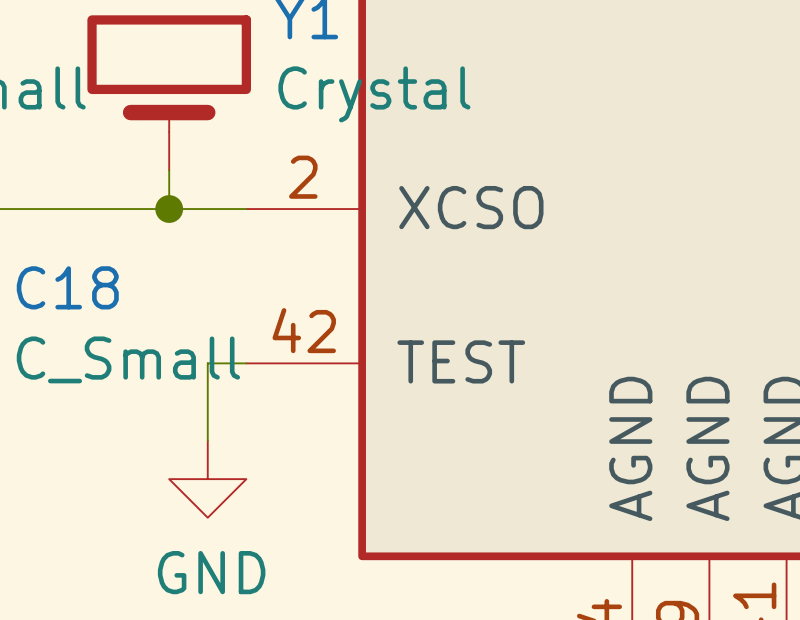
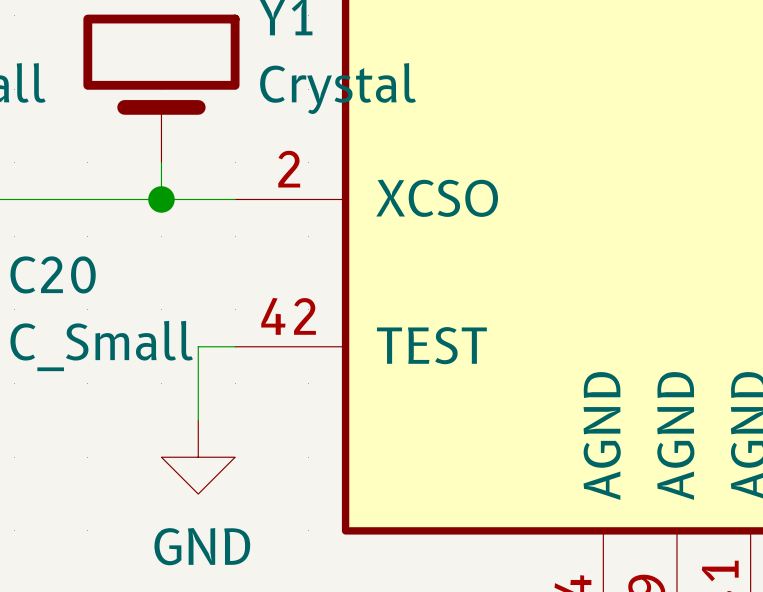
C18 name: C18 (67, 287) -> C20 (53, 274)

